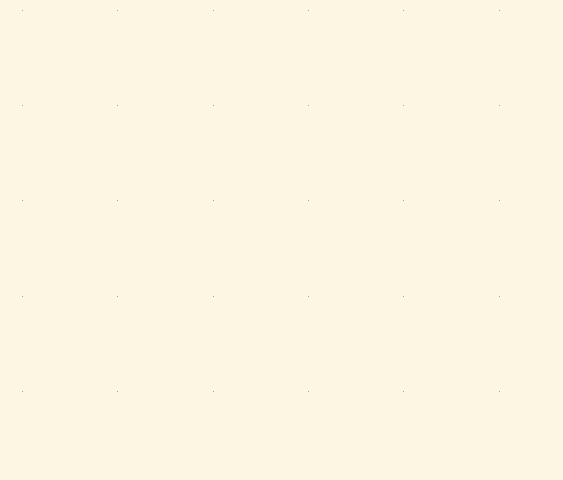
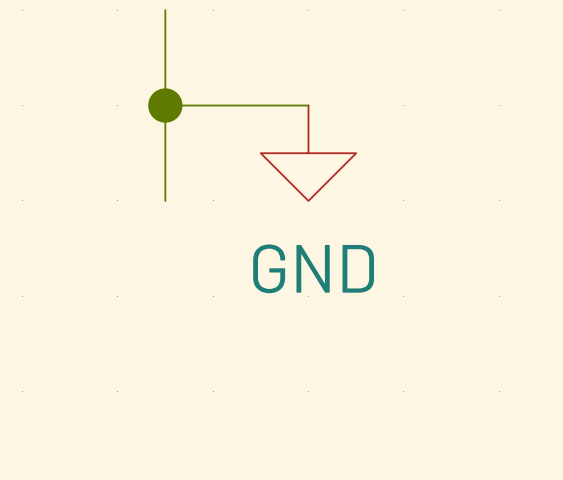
wire: none -> (165, 10) (165, 200)
wire: none -> (165, 105) (308, 105)
junction: none -> (165, 105)
power symbol: none -> GND (308, 153)

